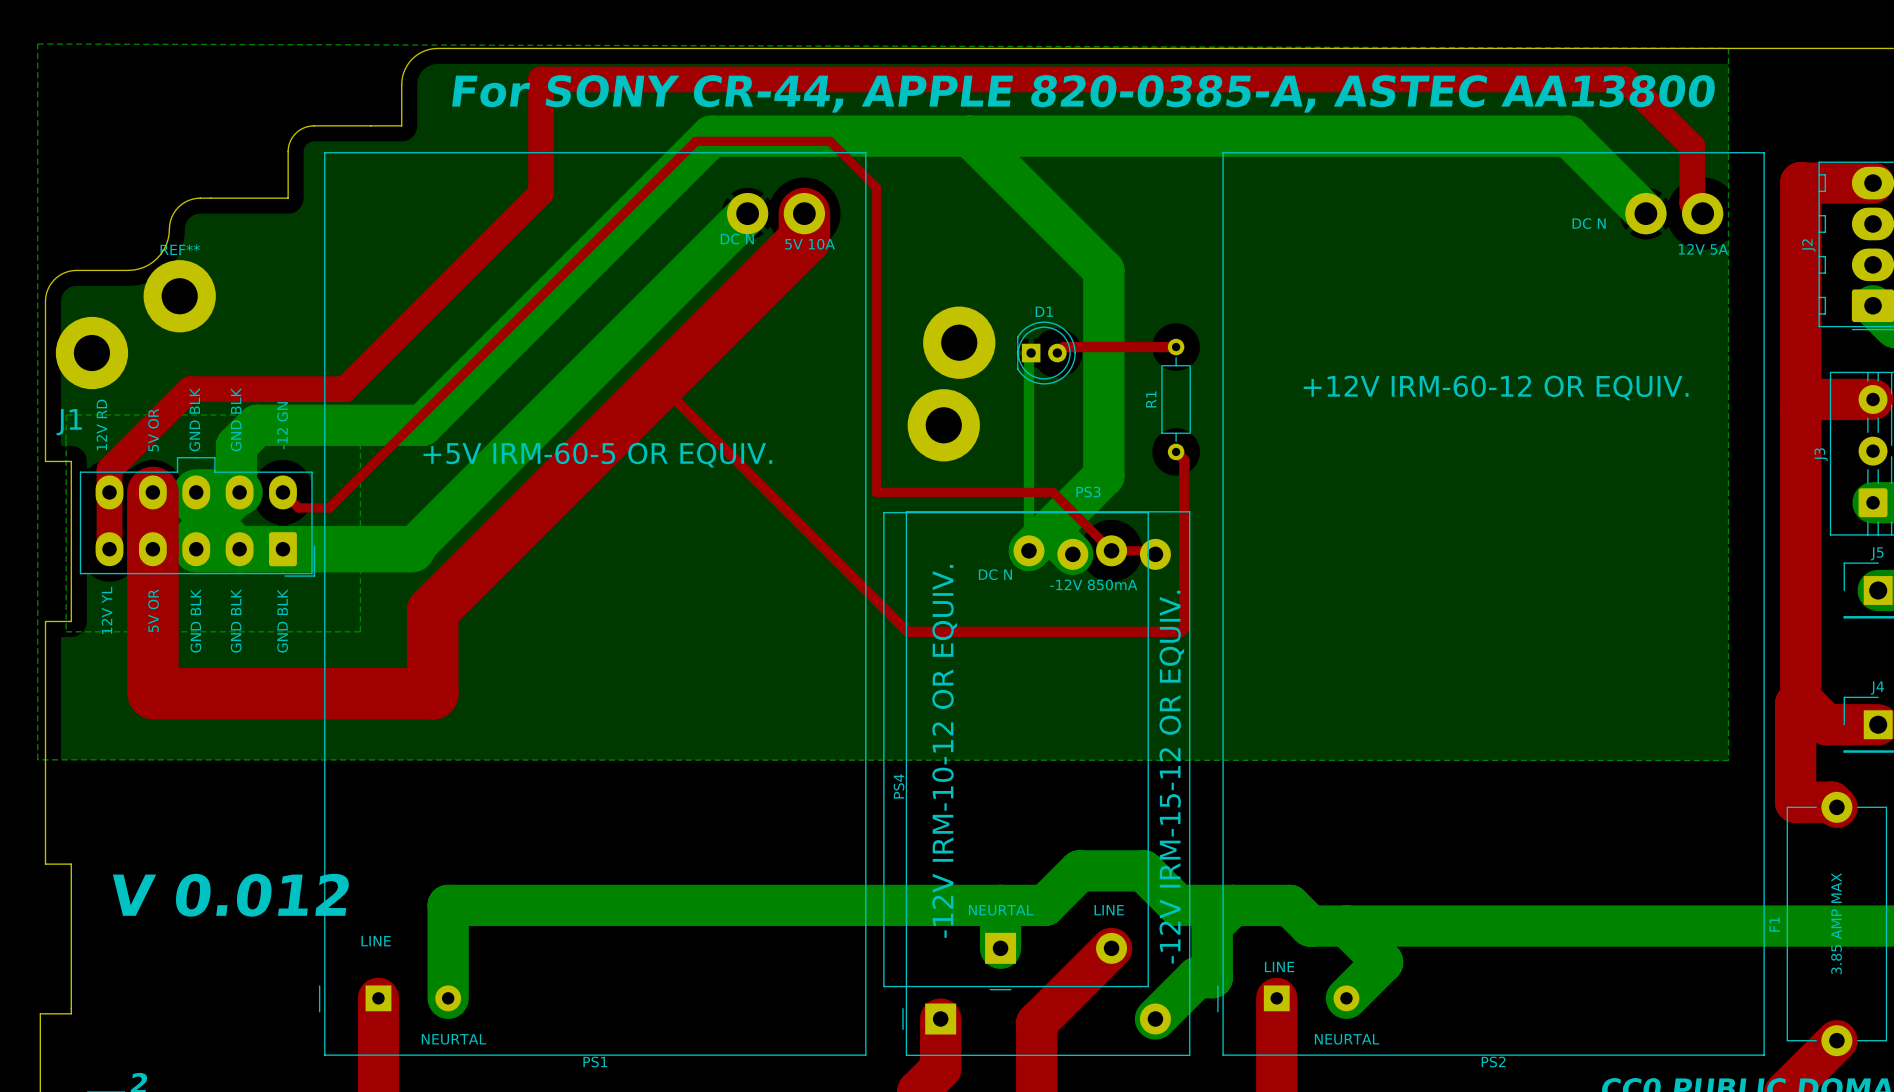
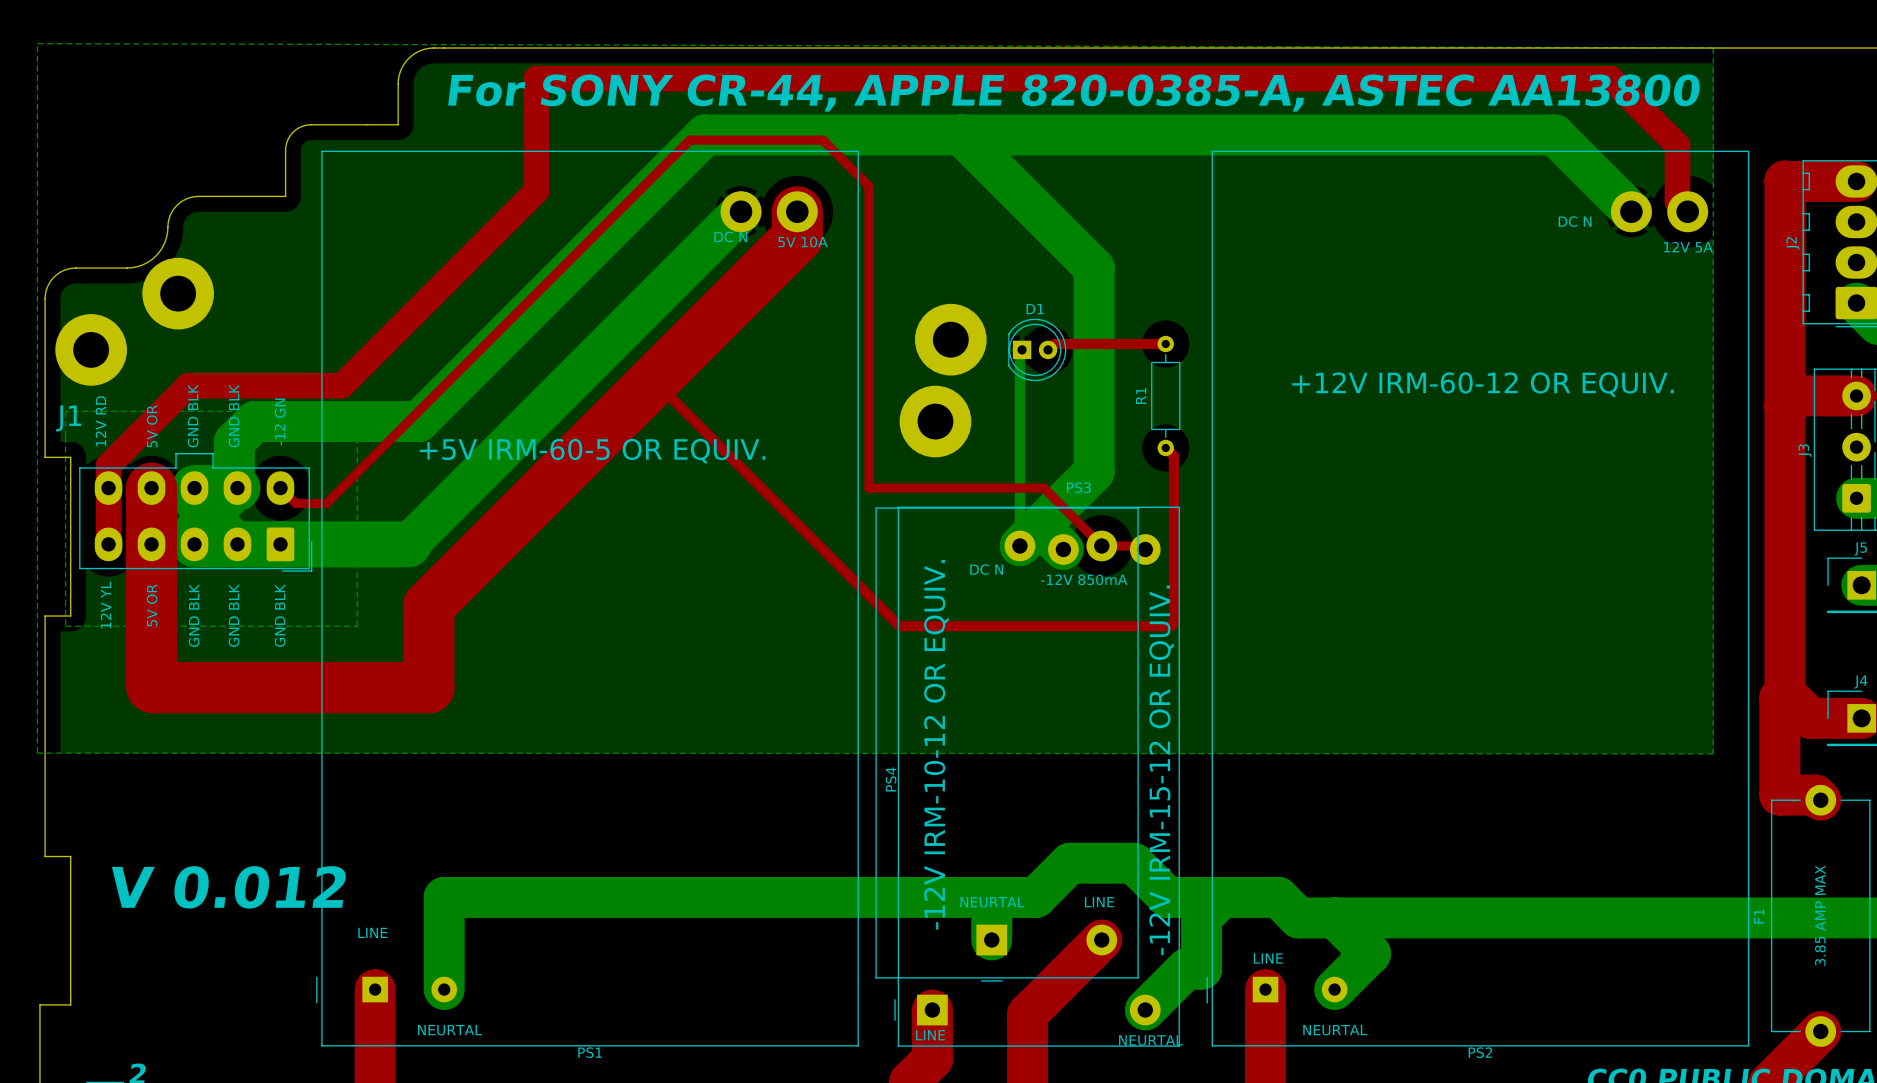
REF** name: REF** (180, 249) -> none
text: none -> LINE (930, 1035)
text: none -> NEURTAL (1151, 1040)

